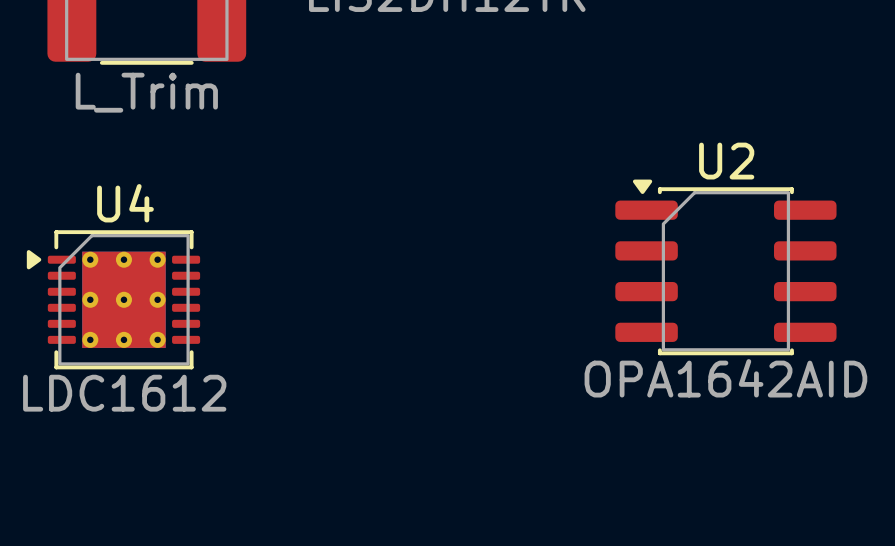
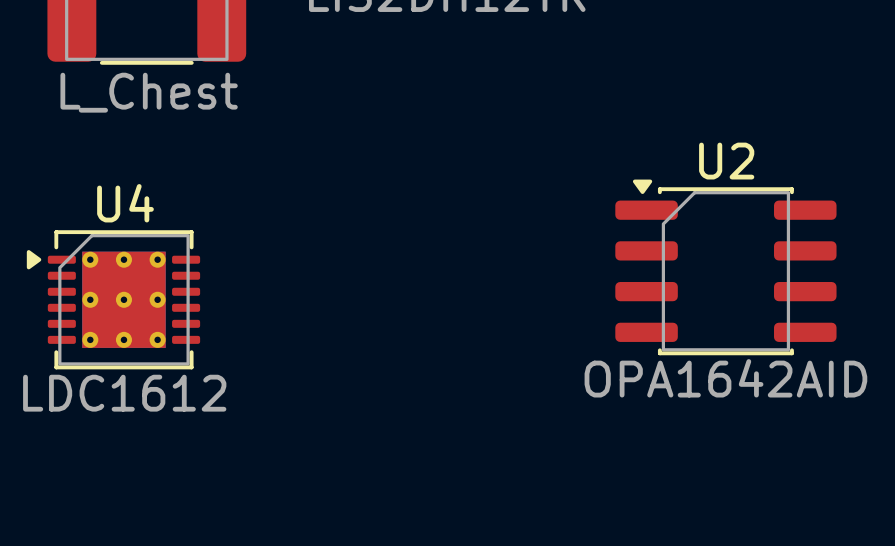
part value: L_Trim (146, 92) -> L_Chest (149, 92)

